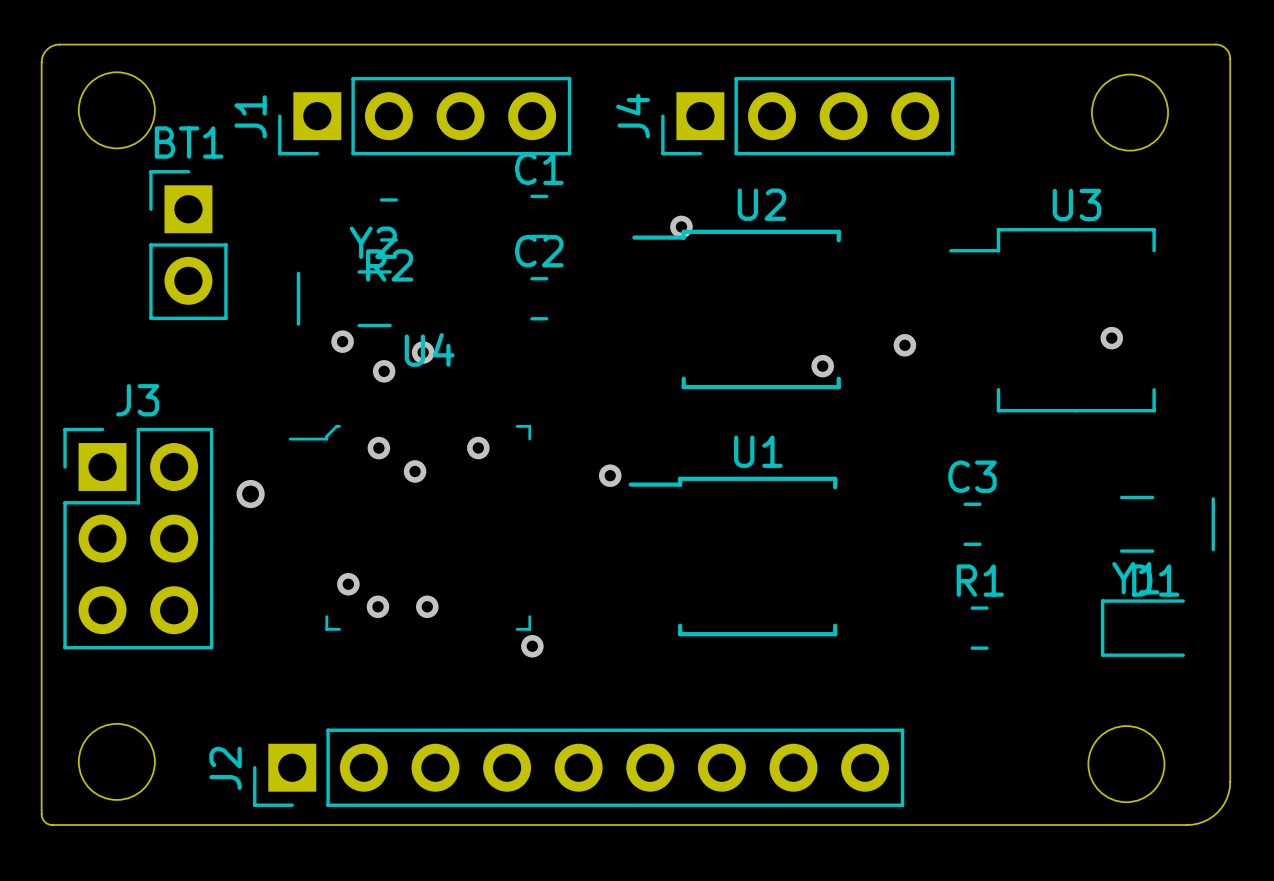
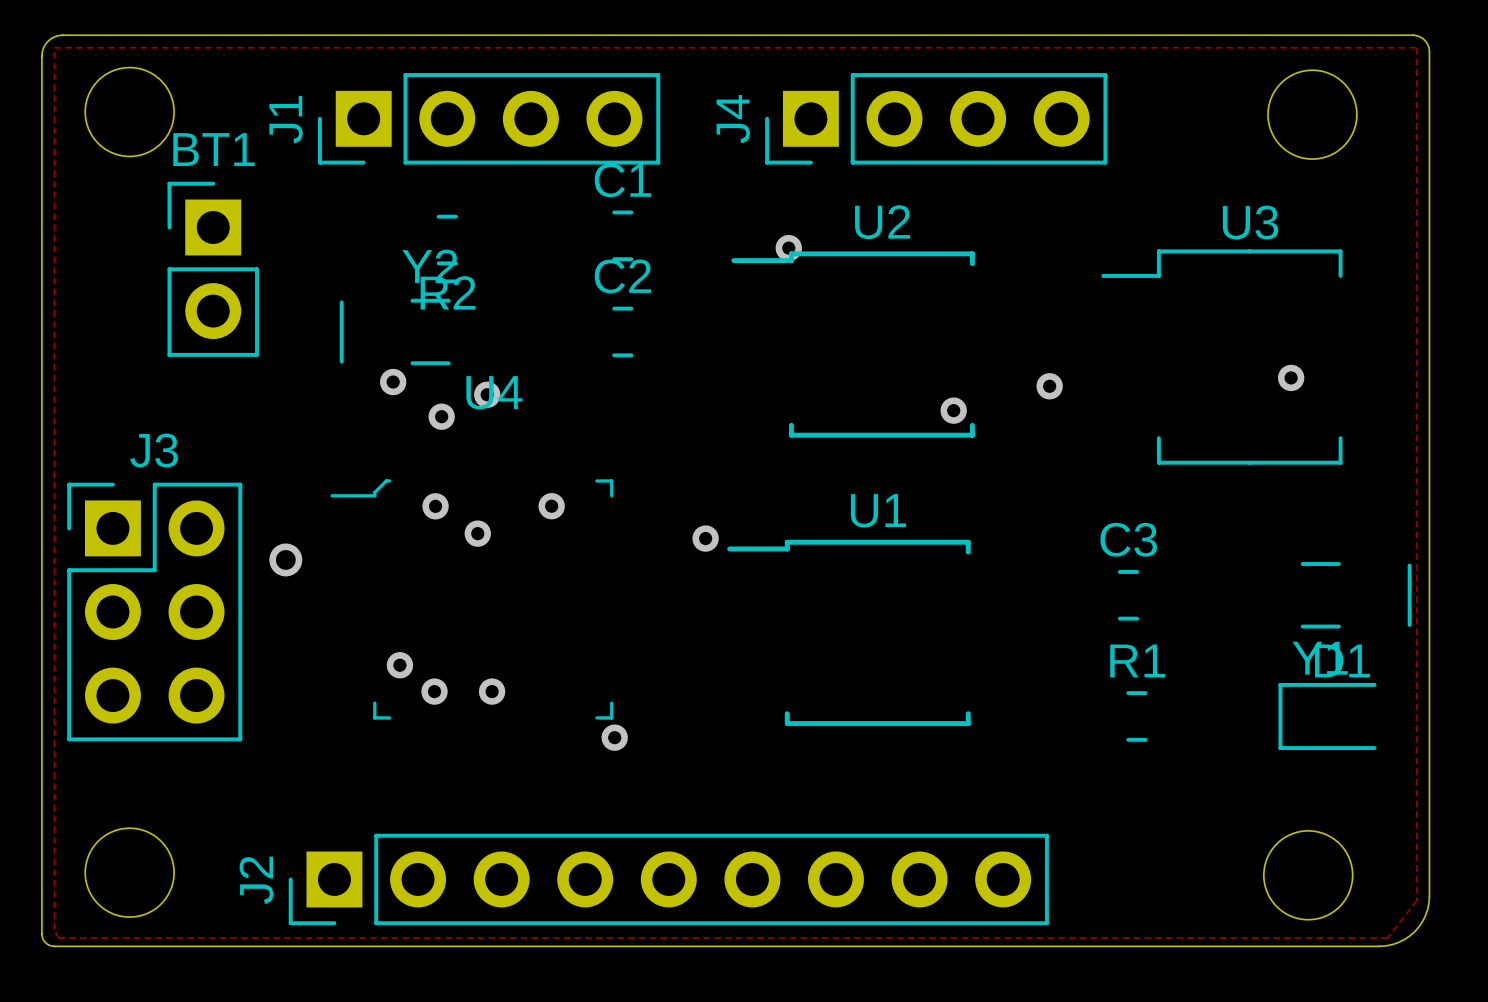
zone outline: none -> (54, 47) (54, 929) (58, 937) (1387, 937) (1416, 900) (1416, 47) (54, 47)

